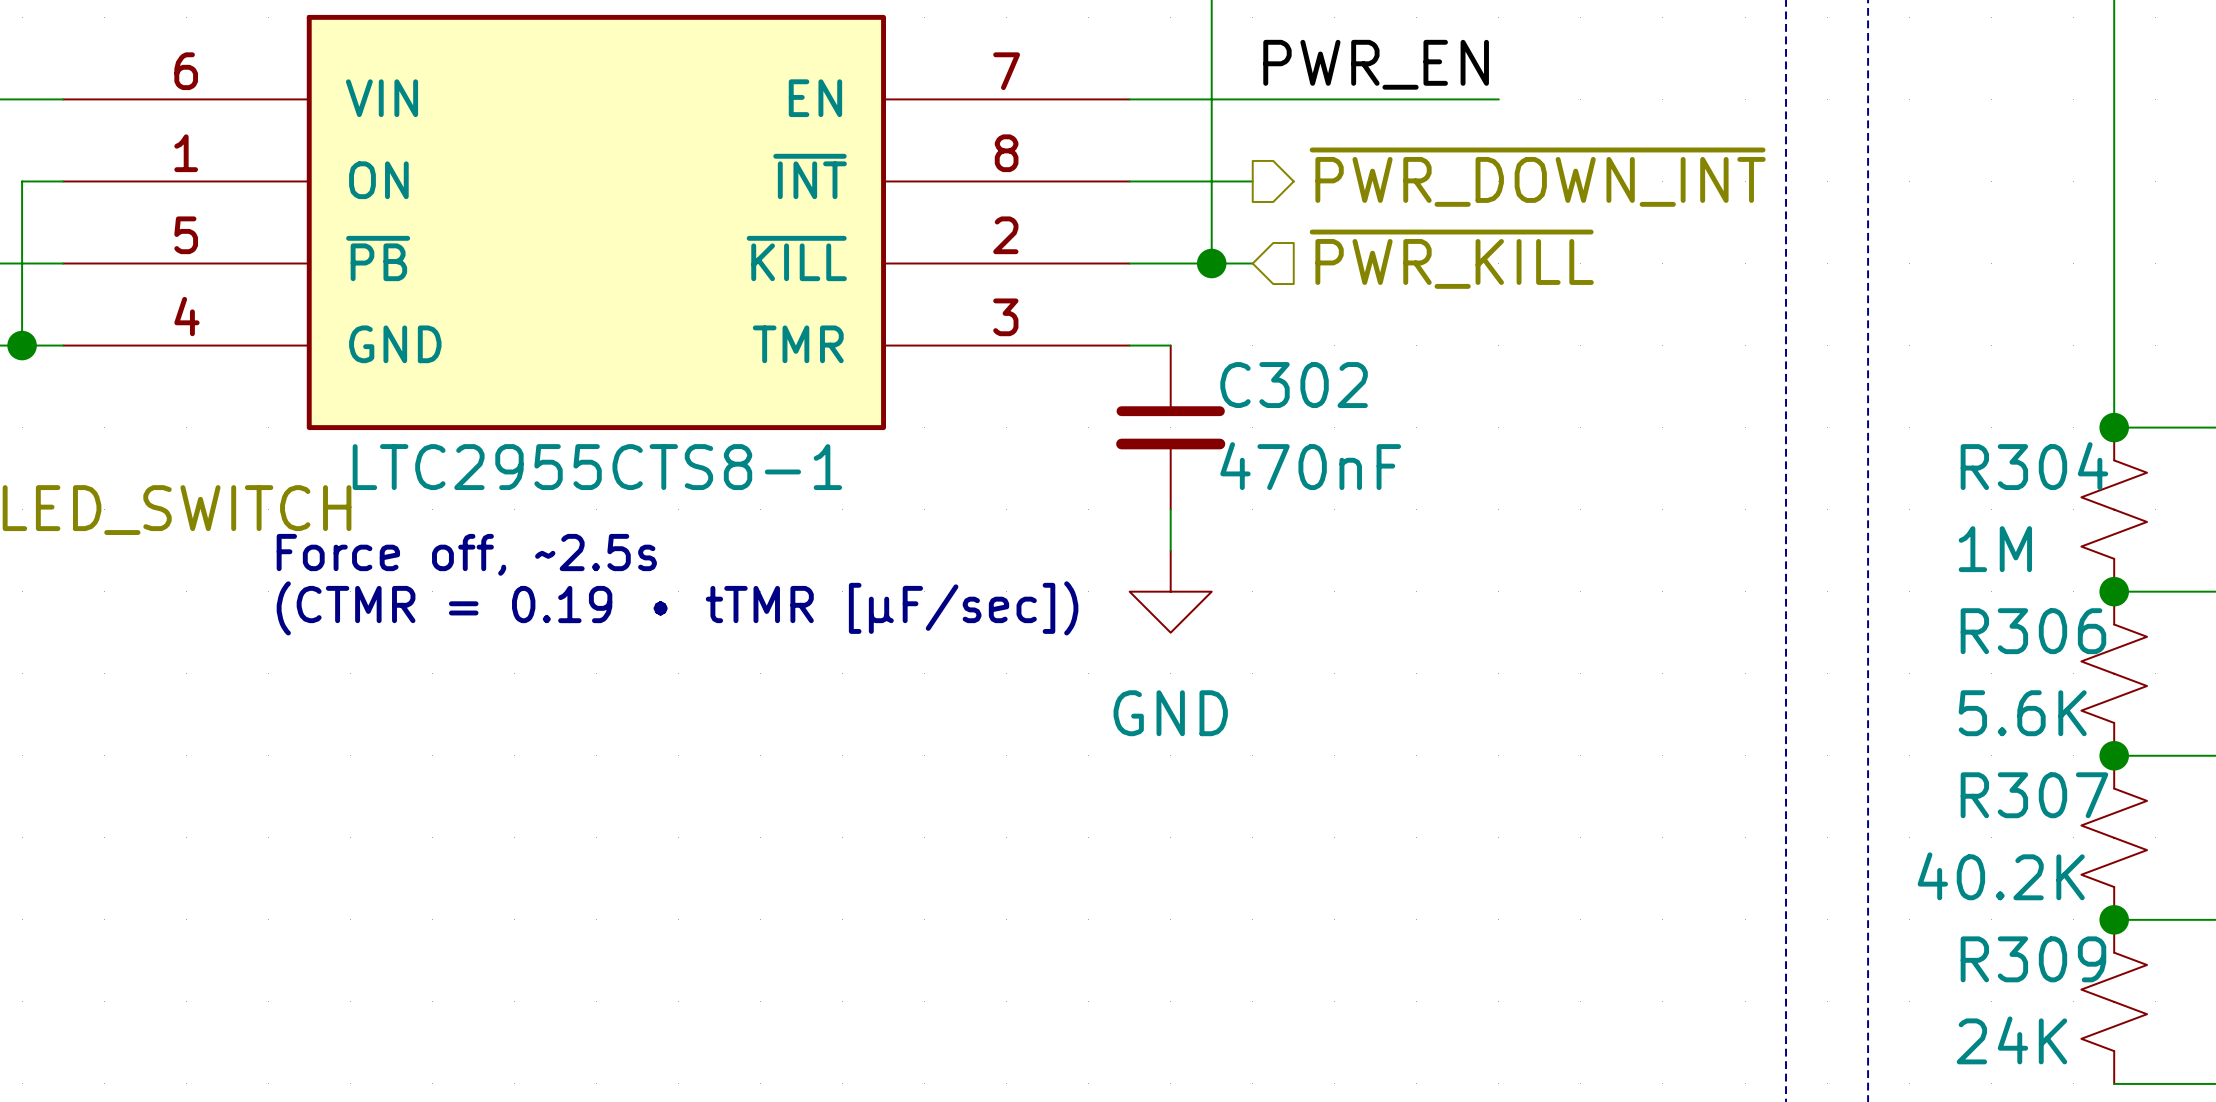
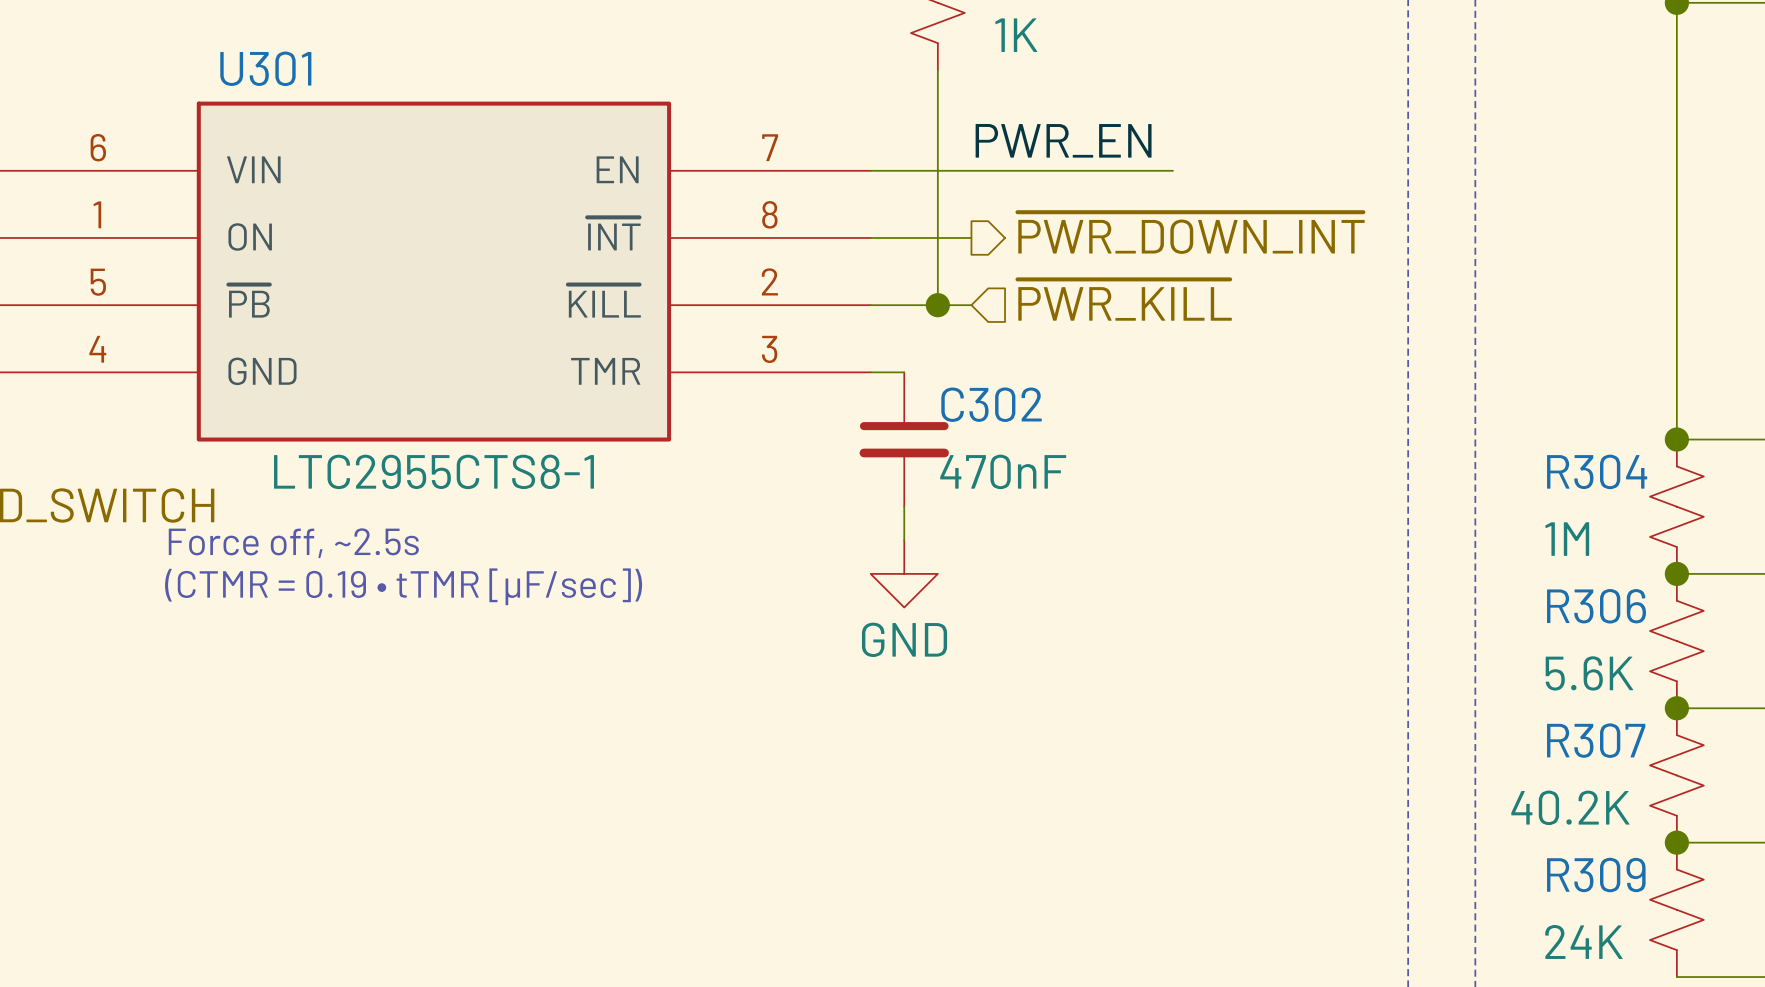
power symbol text position: GND (1170, 713) -> GND (904, 639)

